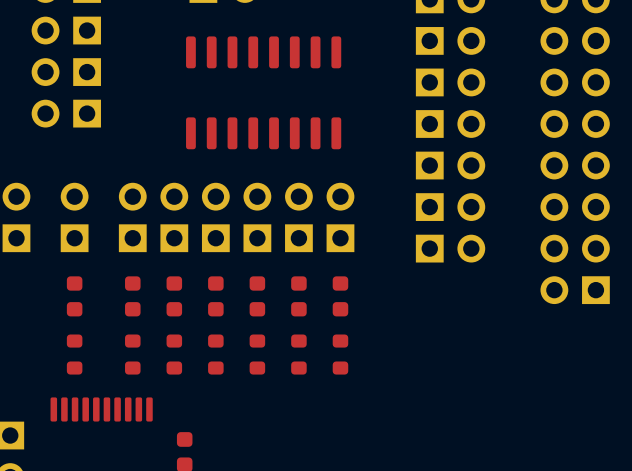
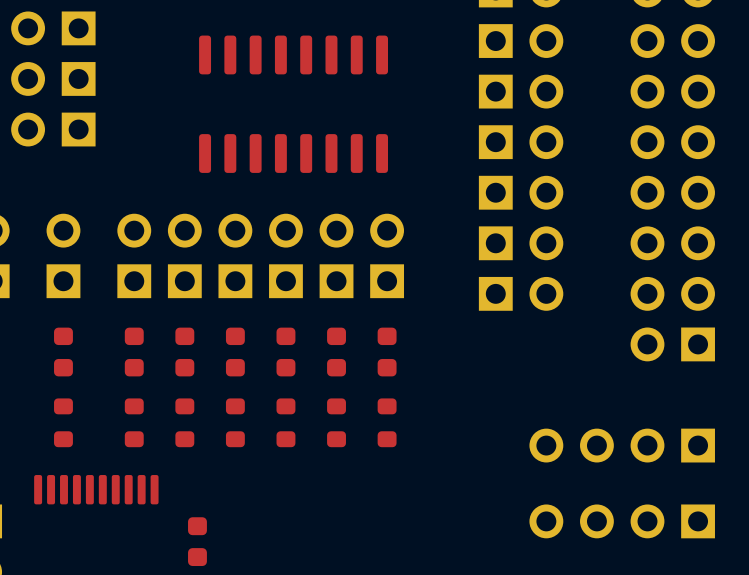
part: none -> (622, 445)
part: none -> (622, 521)

